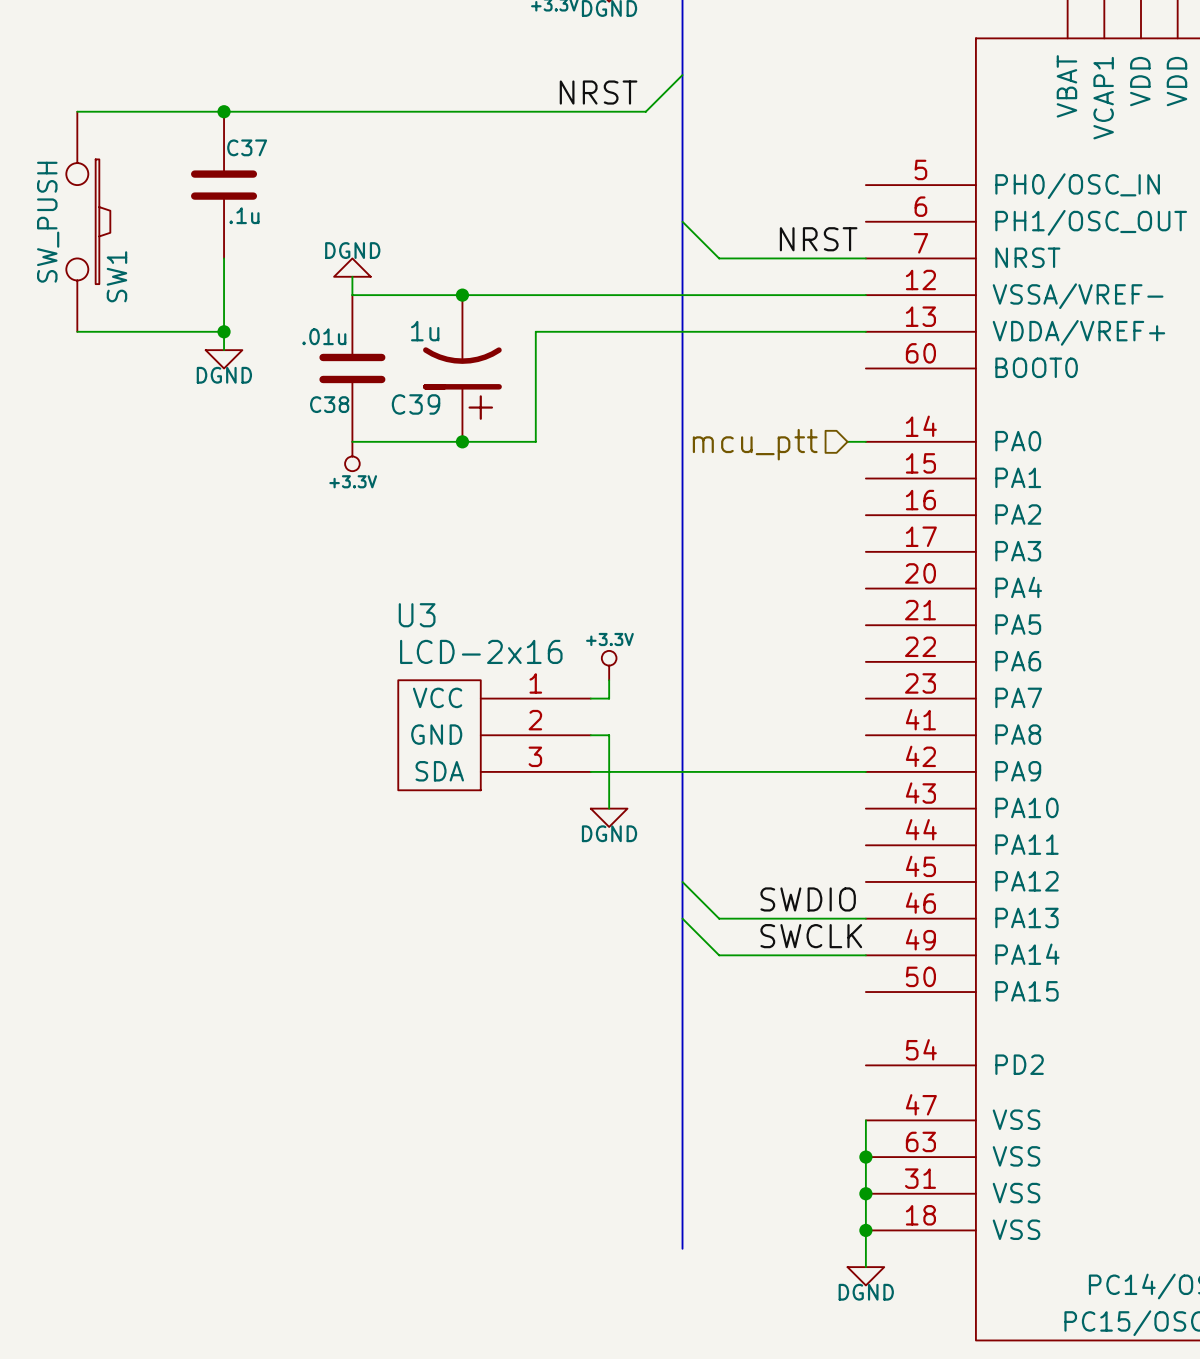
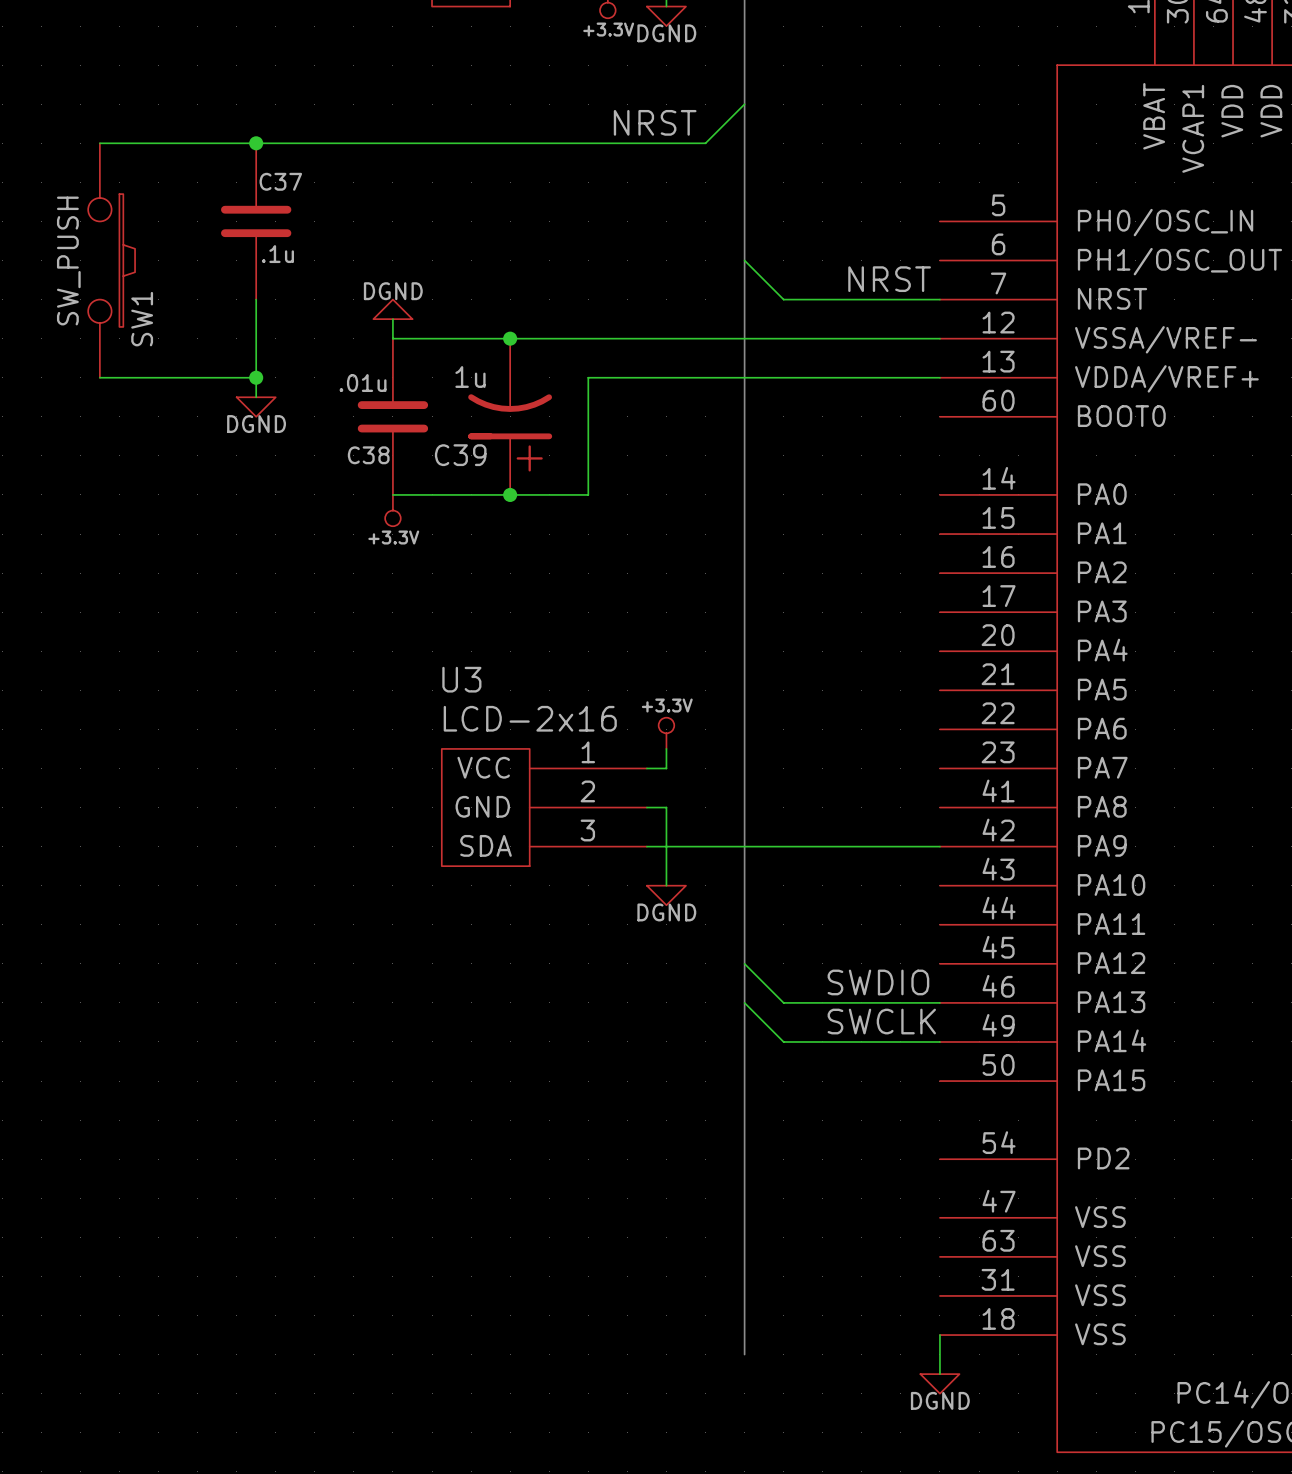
wire: (847, 441) (865, 441) -> none
hierarchical label: mcu_ptt (755, 444) -> none
wire: (865, 1120) (865, 1230) -> none
junction: (865, 1157) -> none
junction: (865, 1193) -> none
junction: (865, 1230) -> none

